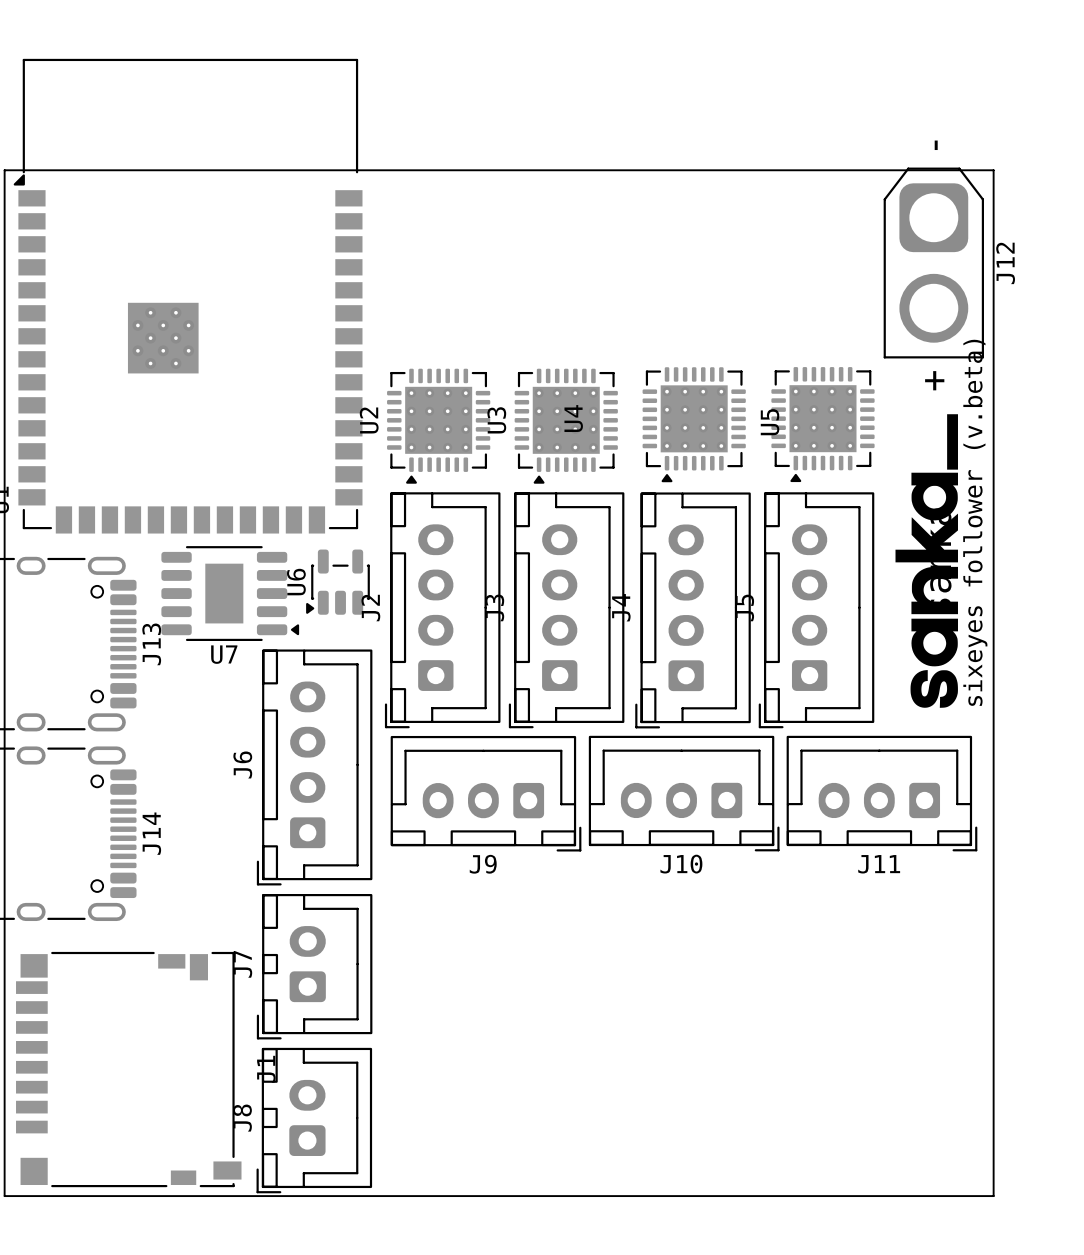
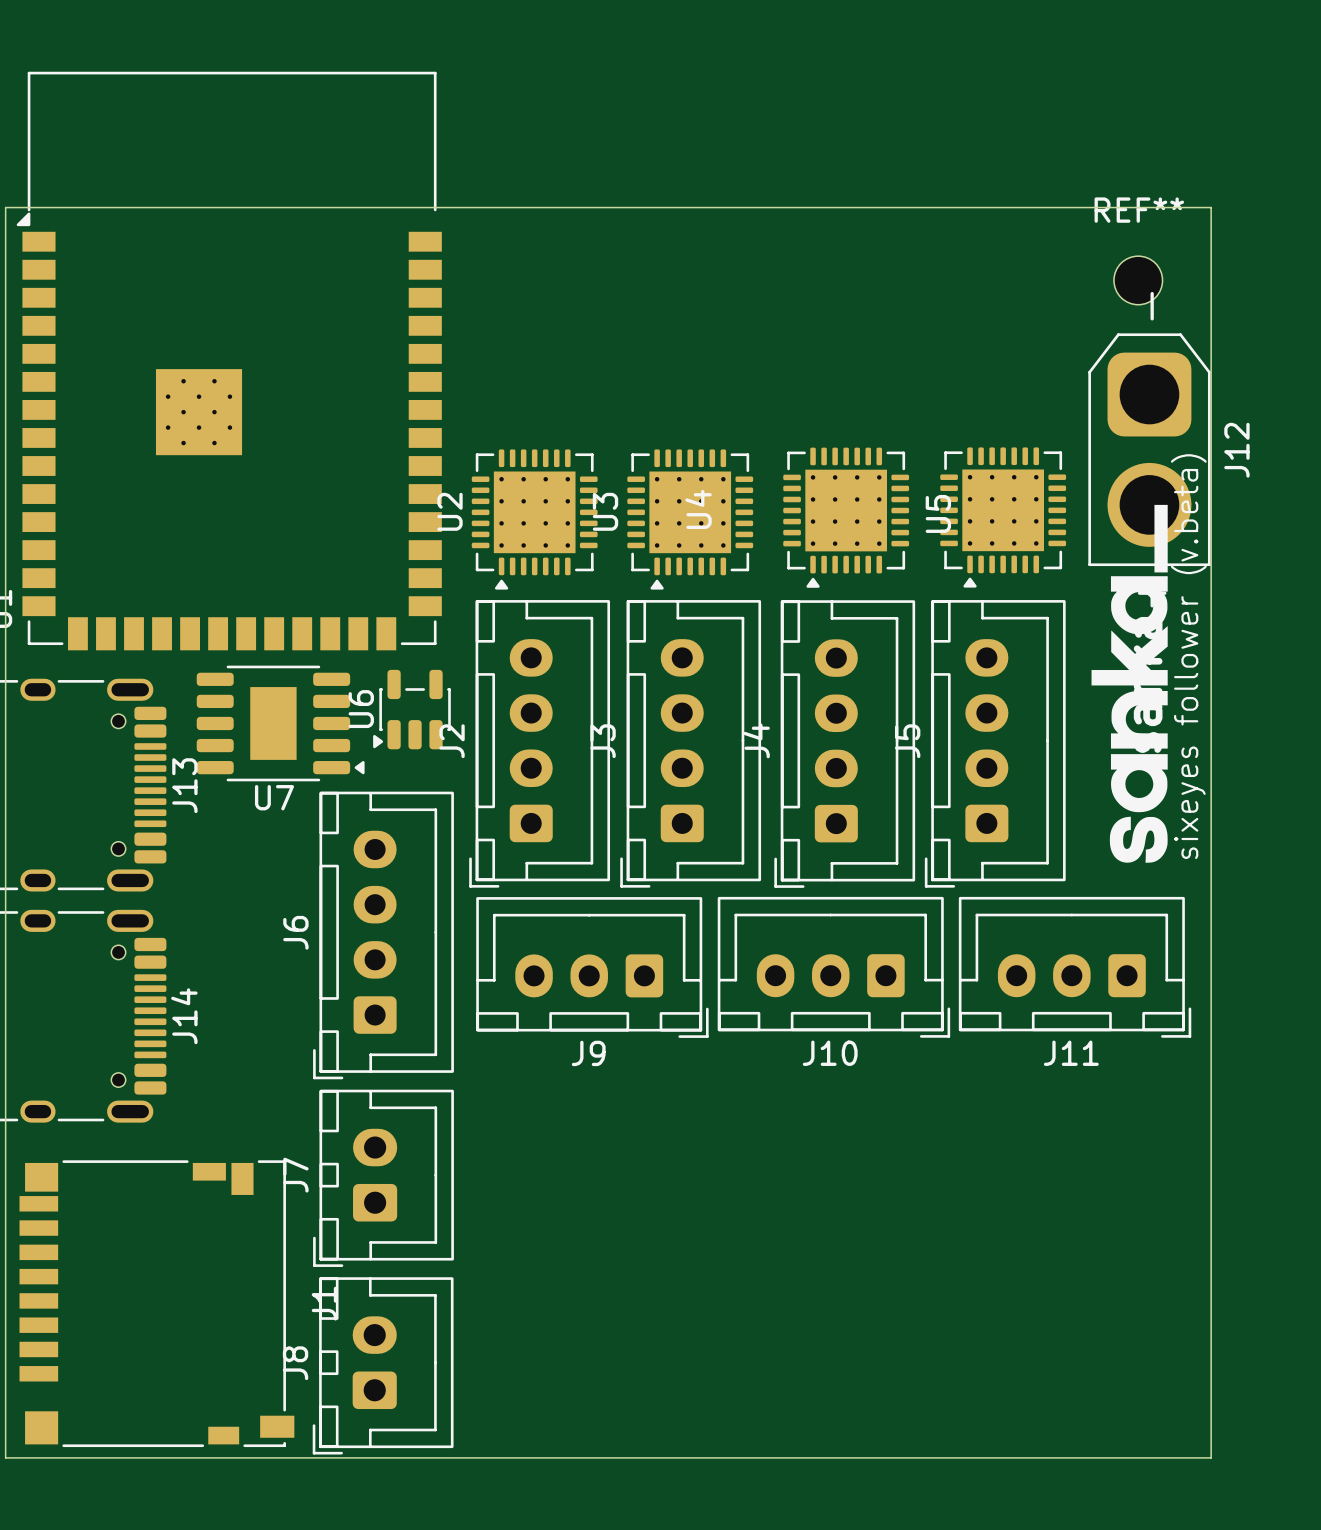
REF**: none -> (1138, 280)
J12 position: (933, 263) -> (1149, 449)

